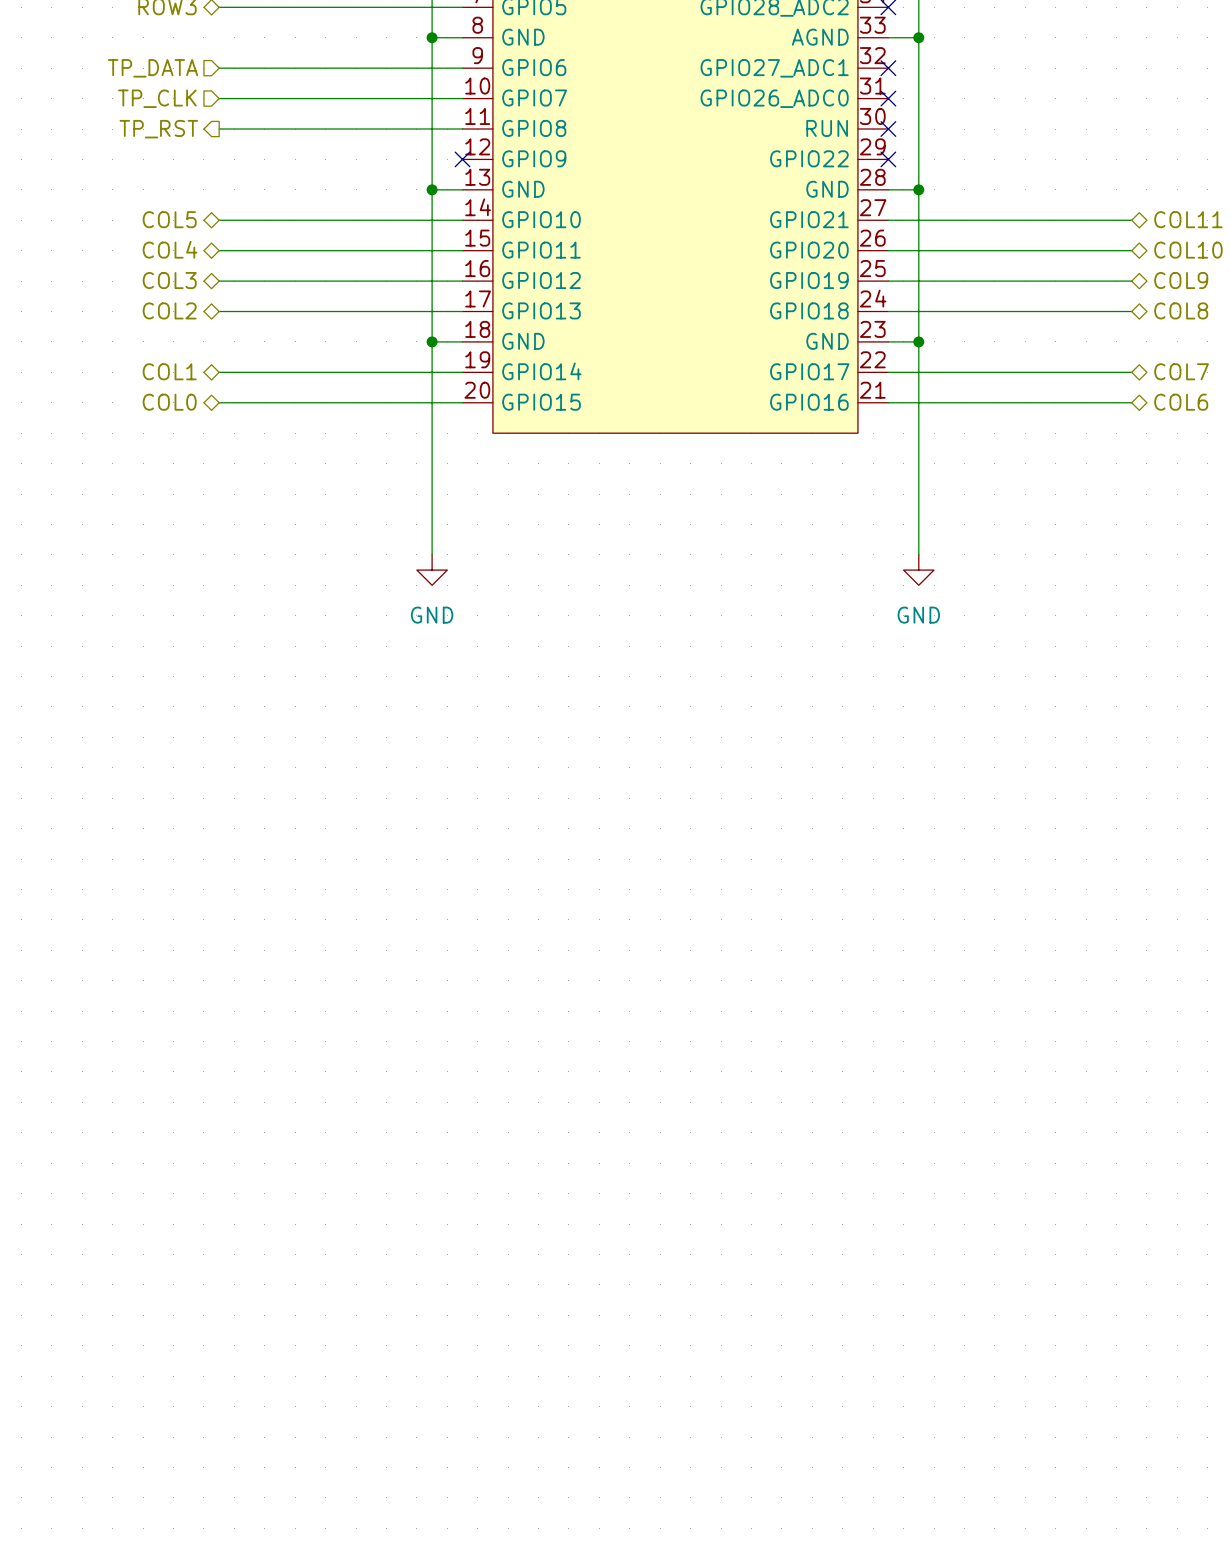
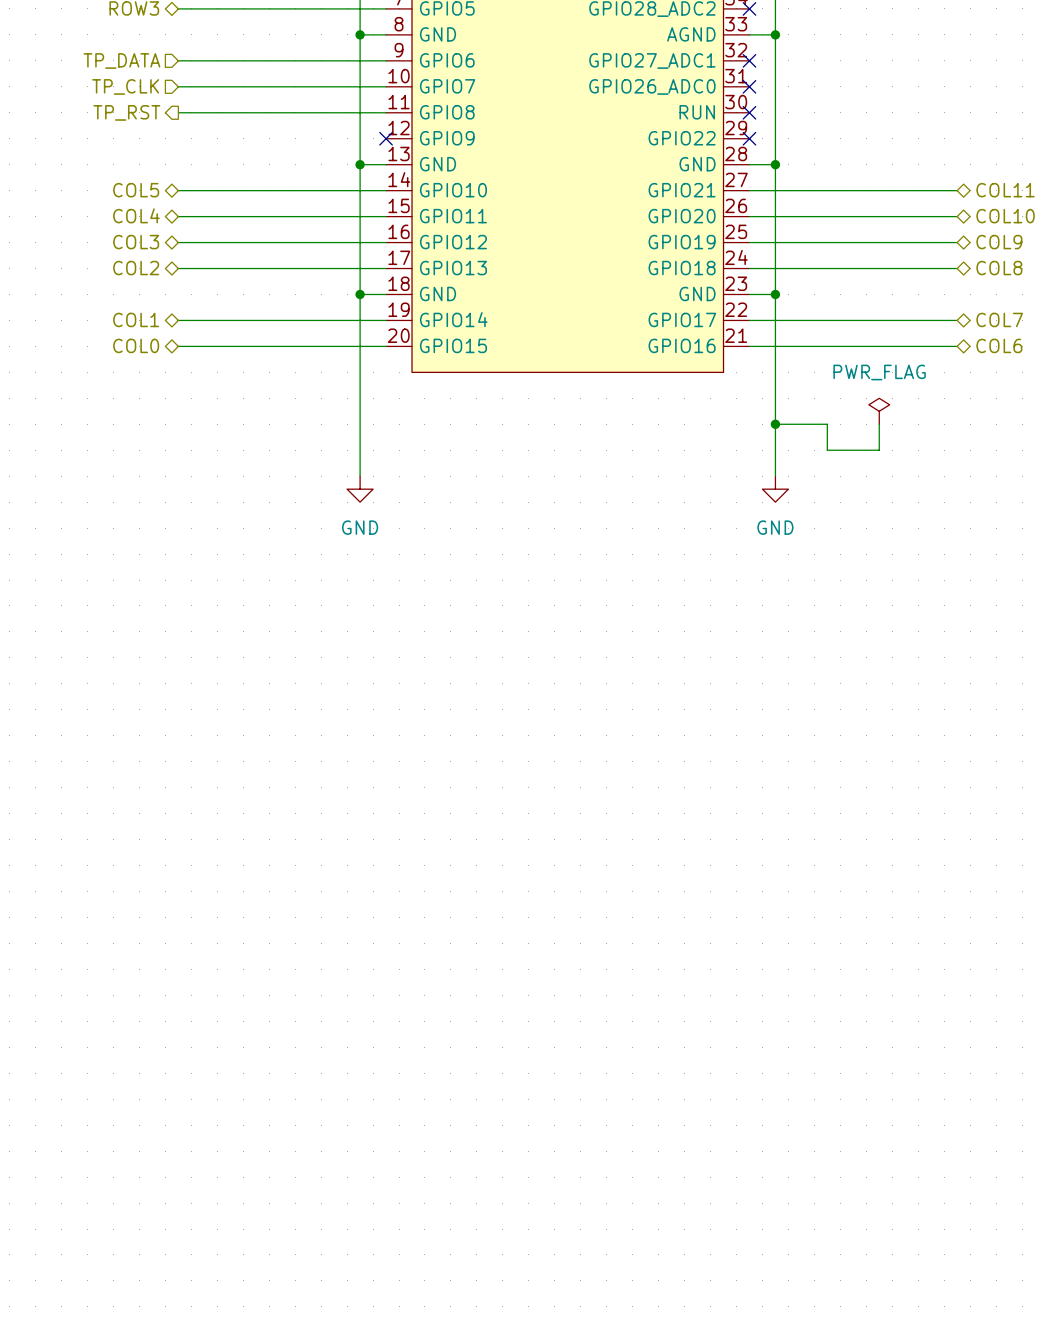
power symbol: none -> PWR_FLAG (879, 411)
wire: none -> (775, 424) (827, 424) (827, 450) (879, 450) (879, 424)
junction: none -> (775, 424)

